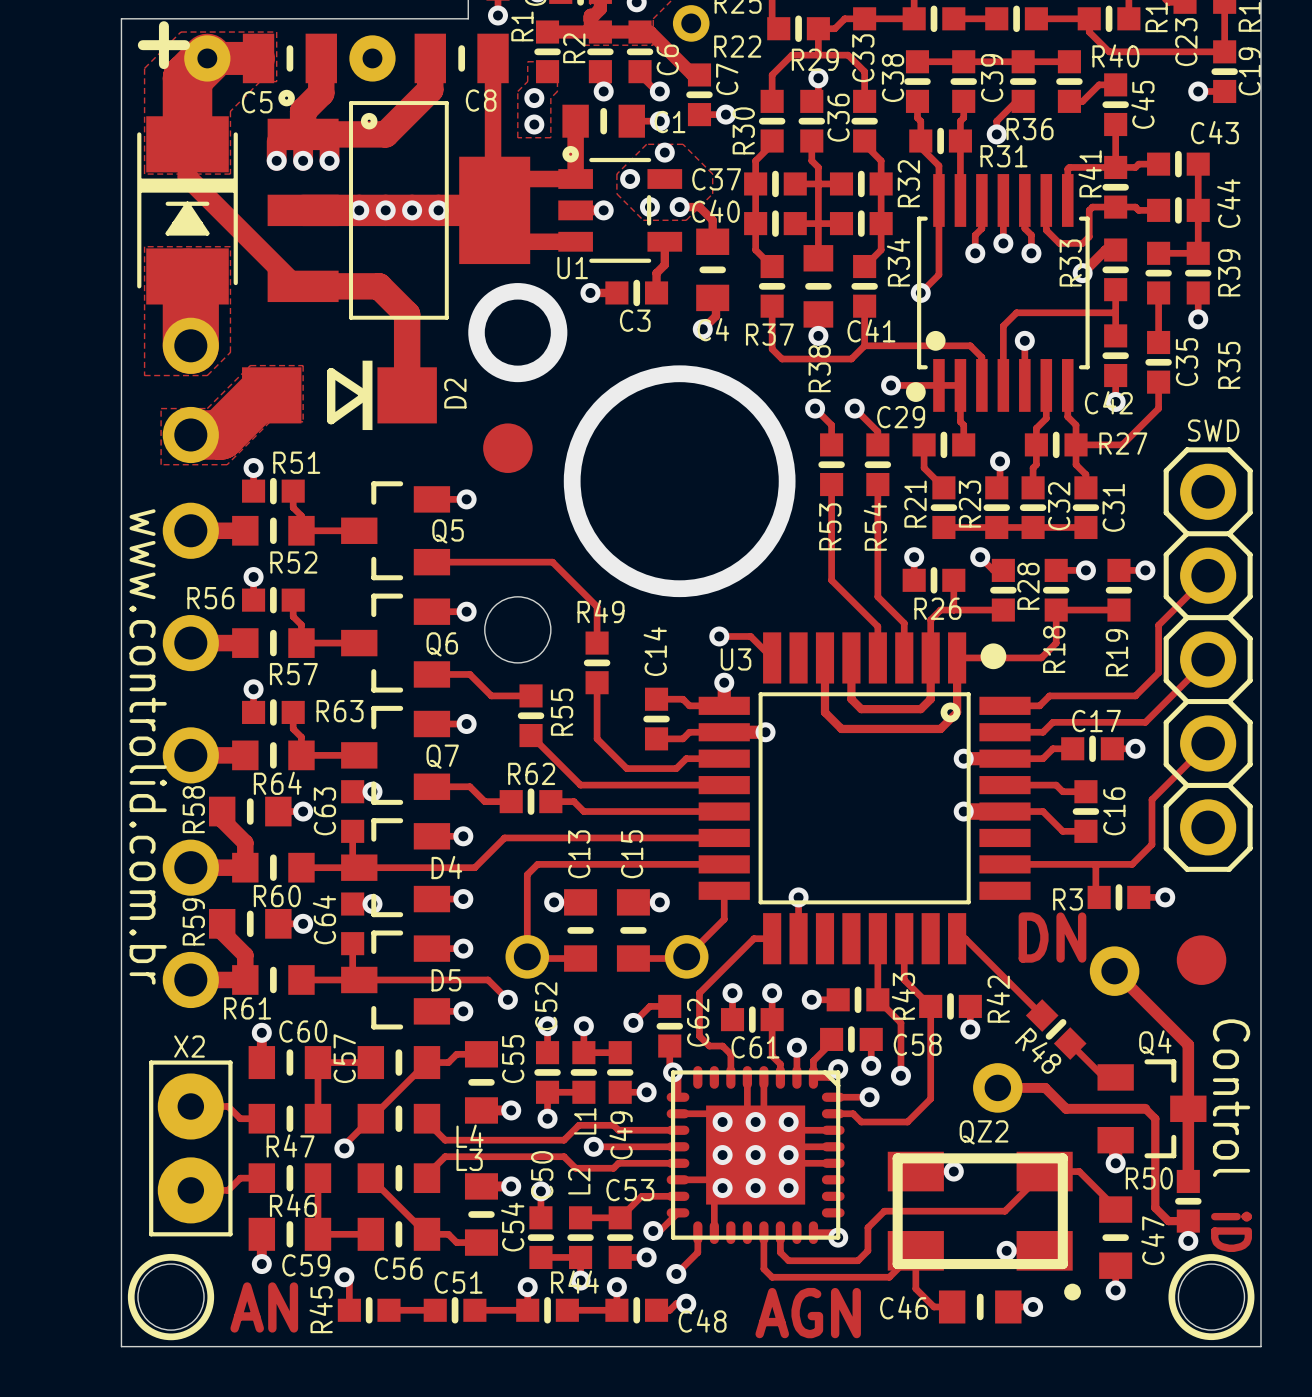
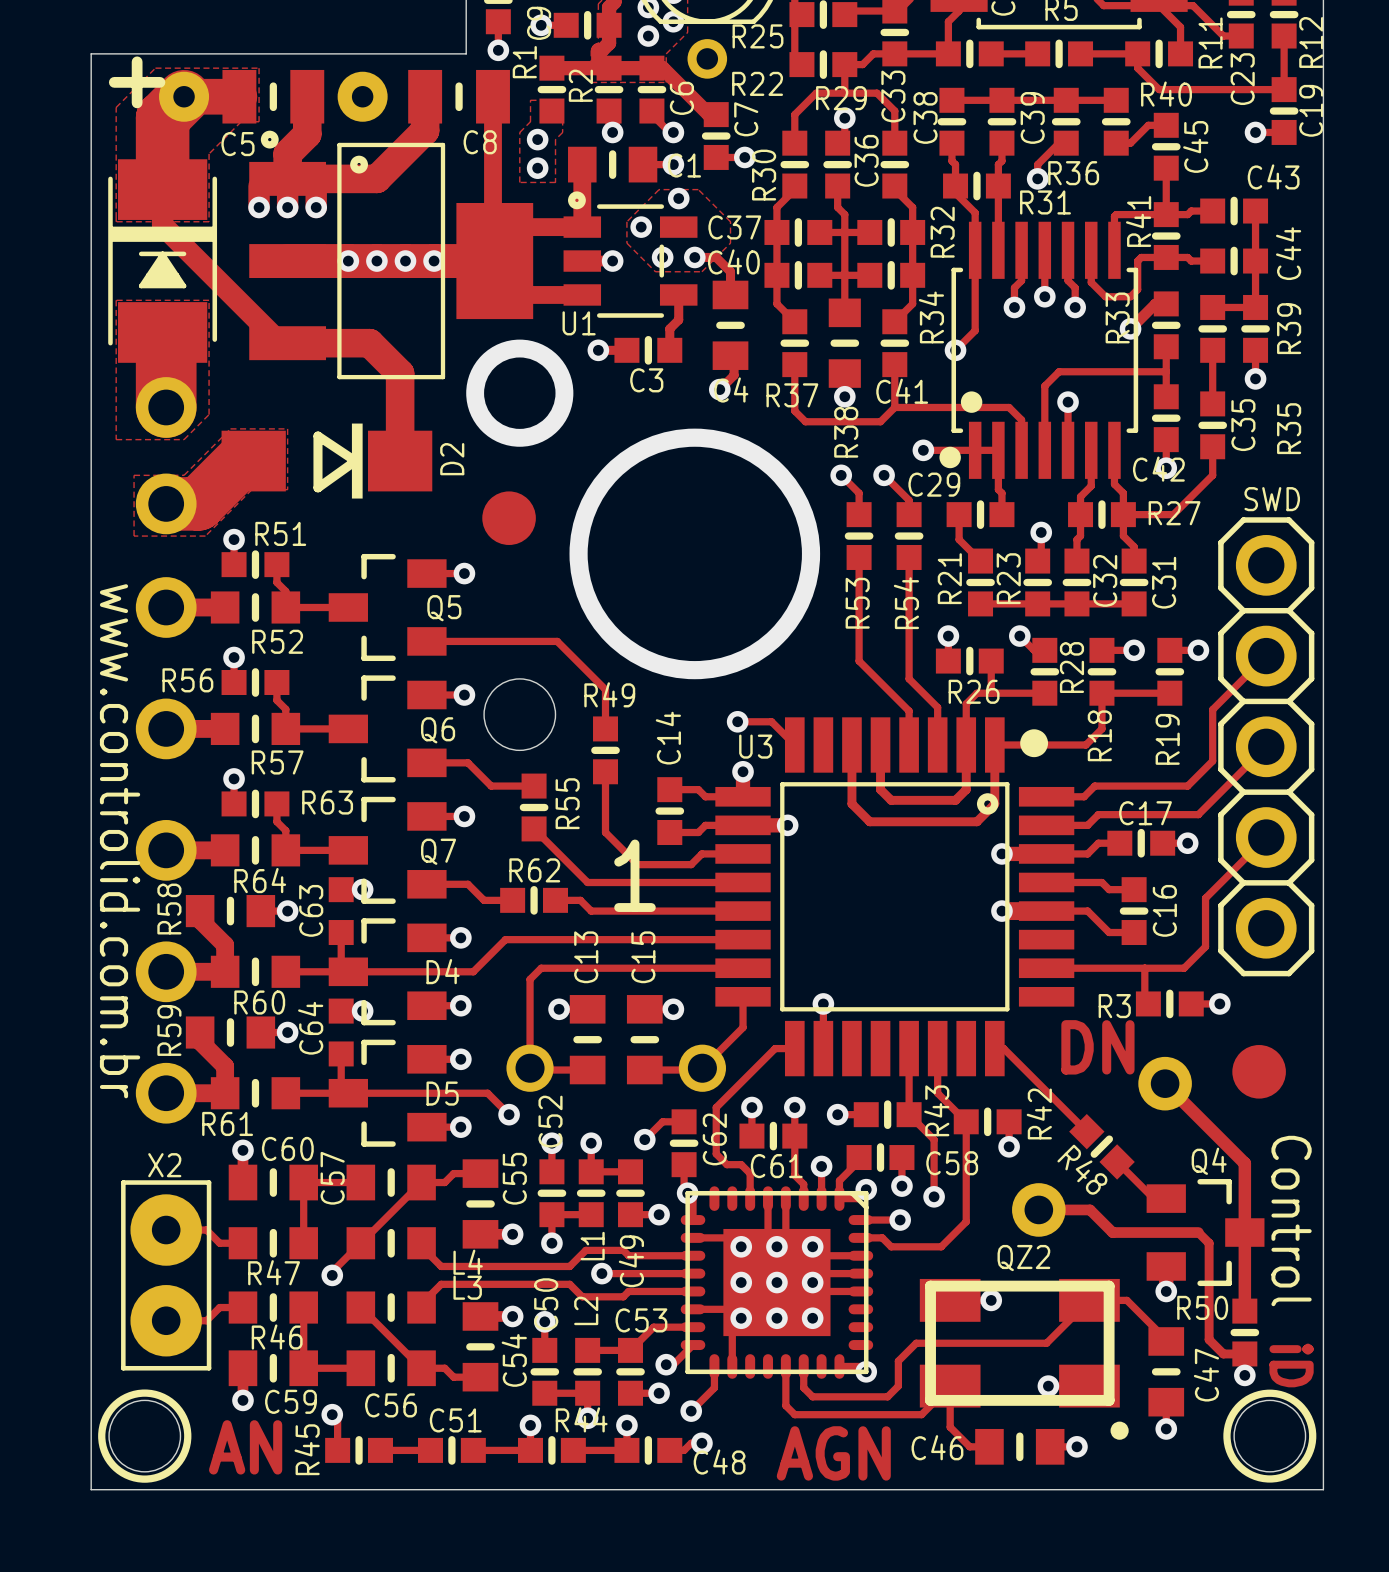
text: none -> 1 (635, 875)

